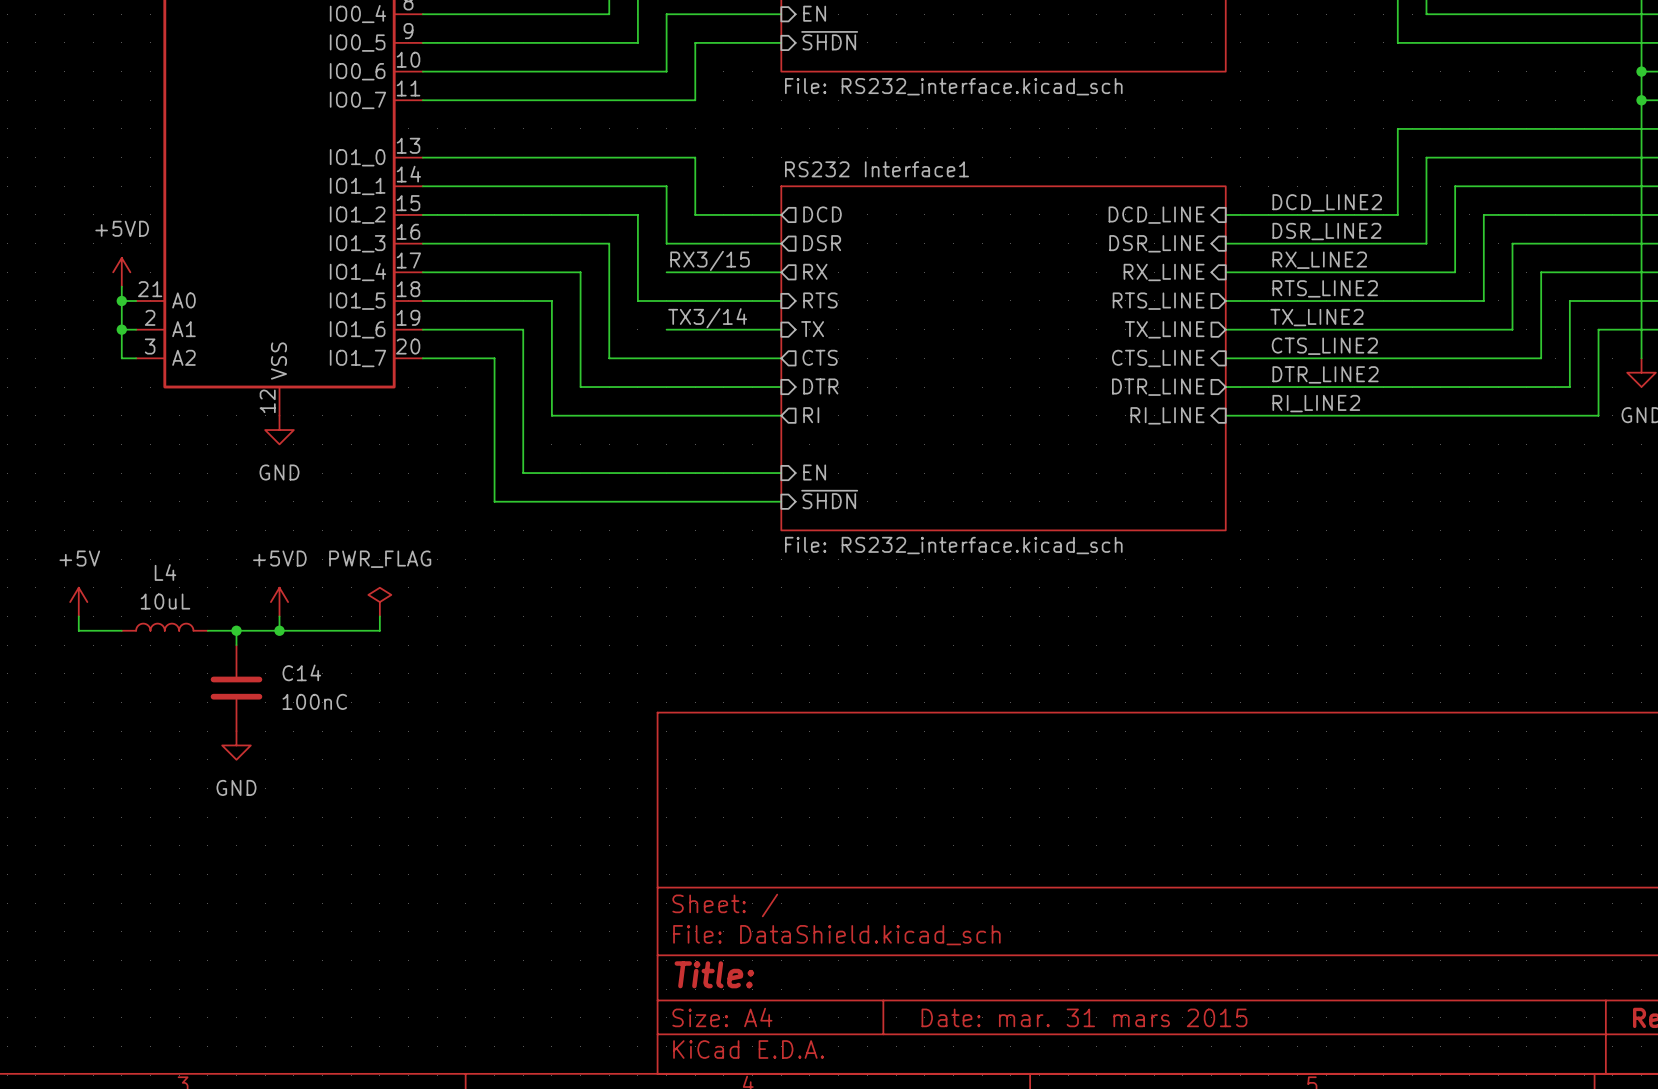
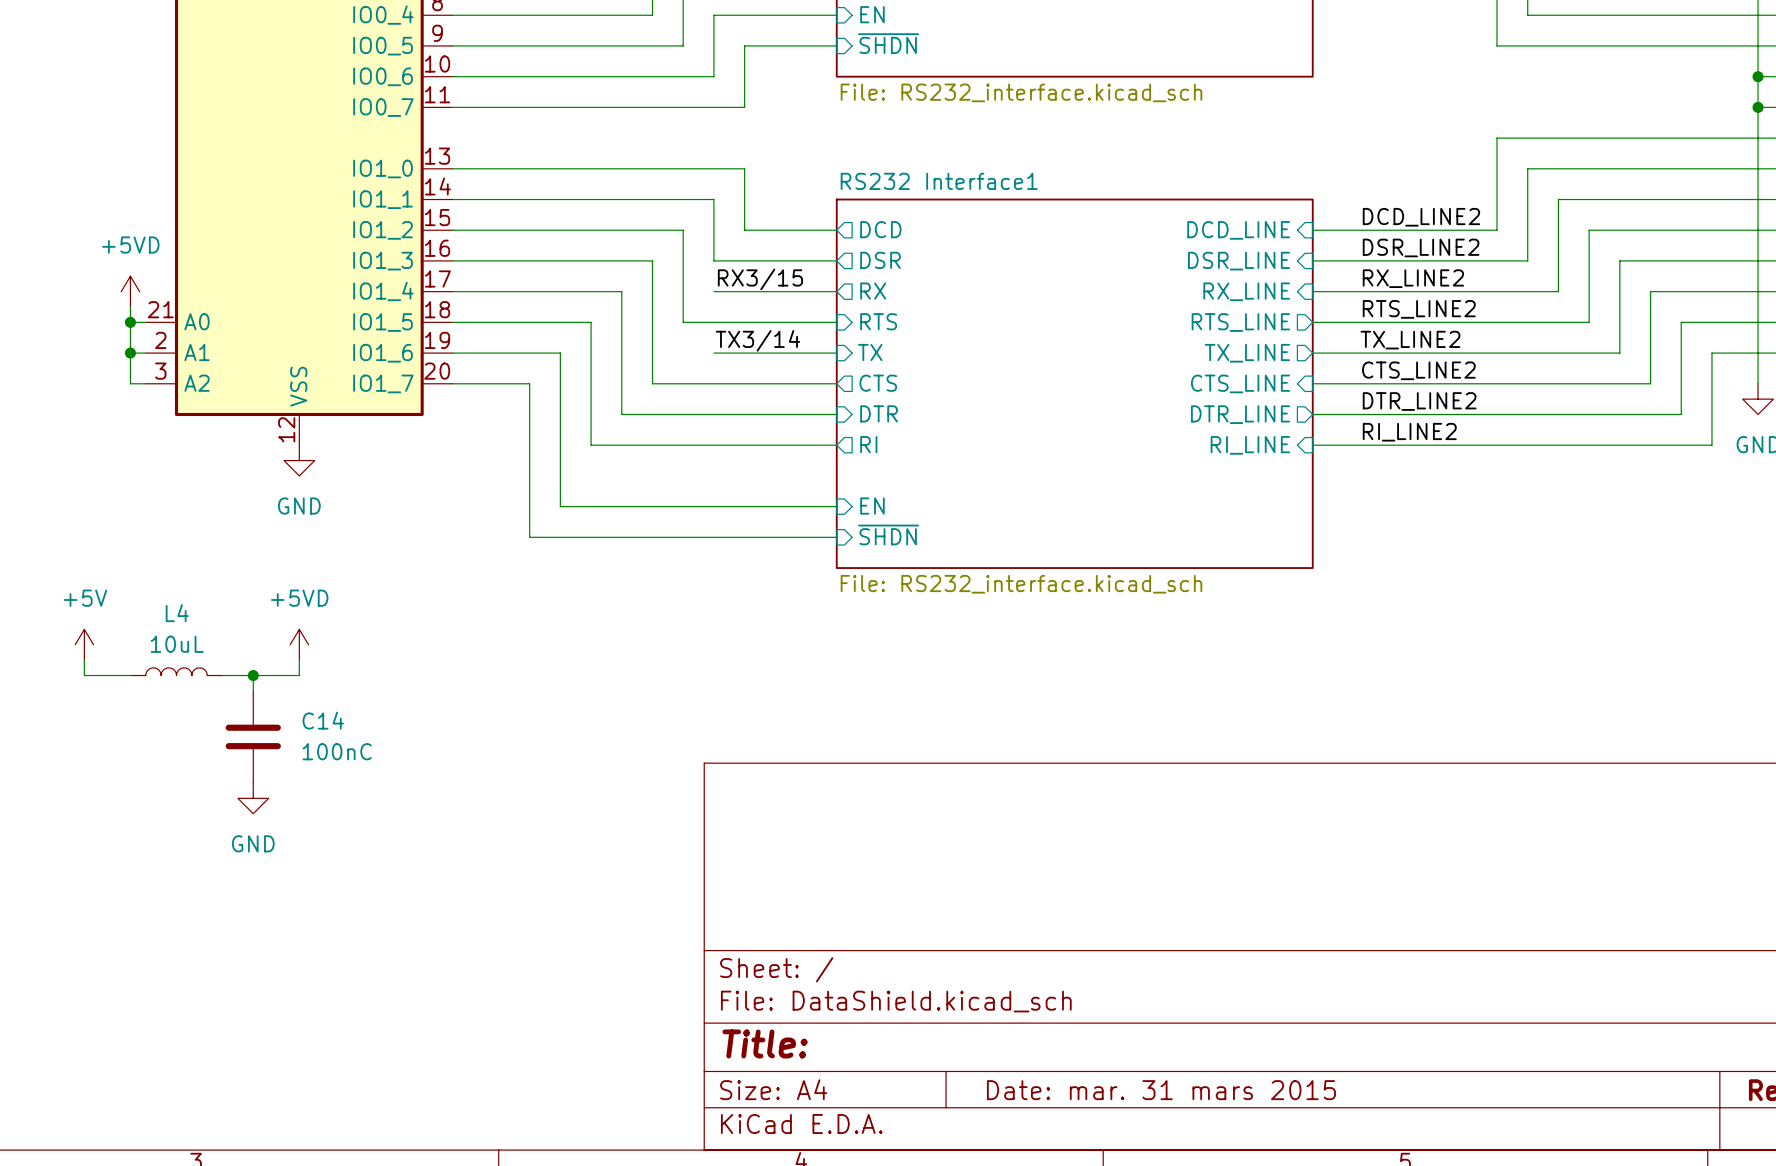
power symbol: PWR_FLAG (379, 602) -> none
wire: (379, 616) (379, 630) (279, 630) -> none
junction: (279, 630) -> none

